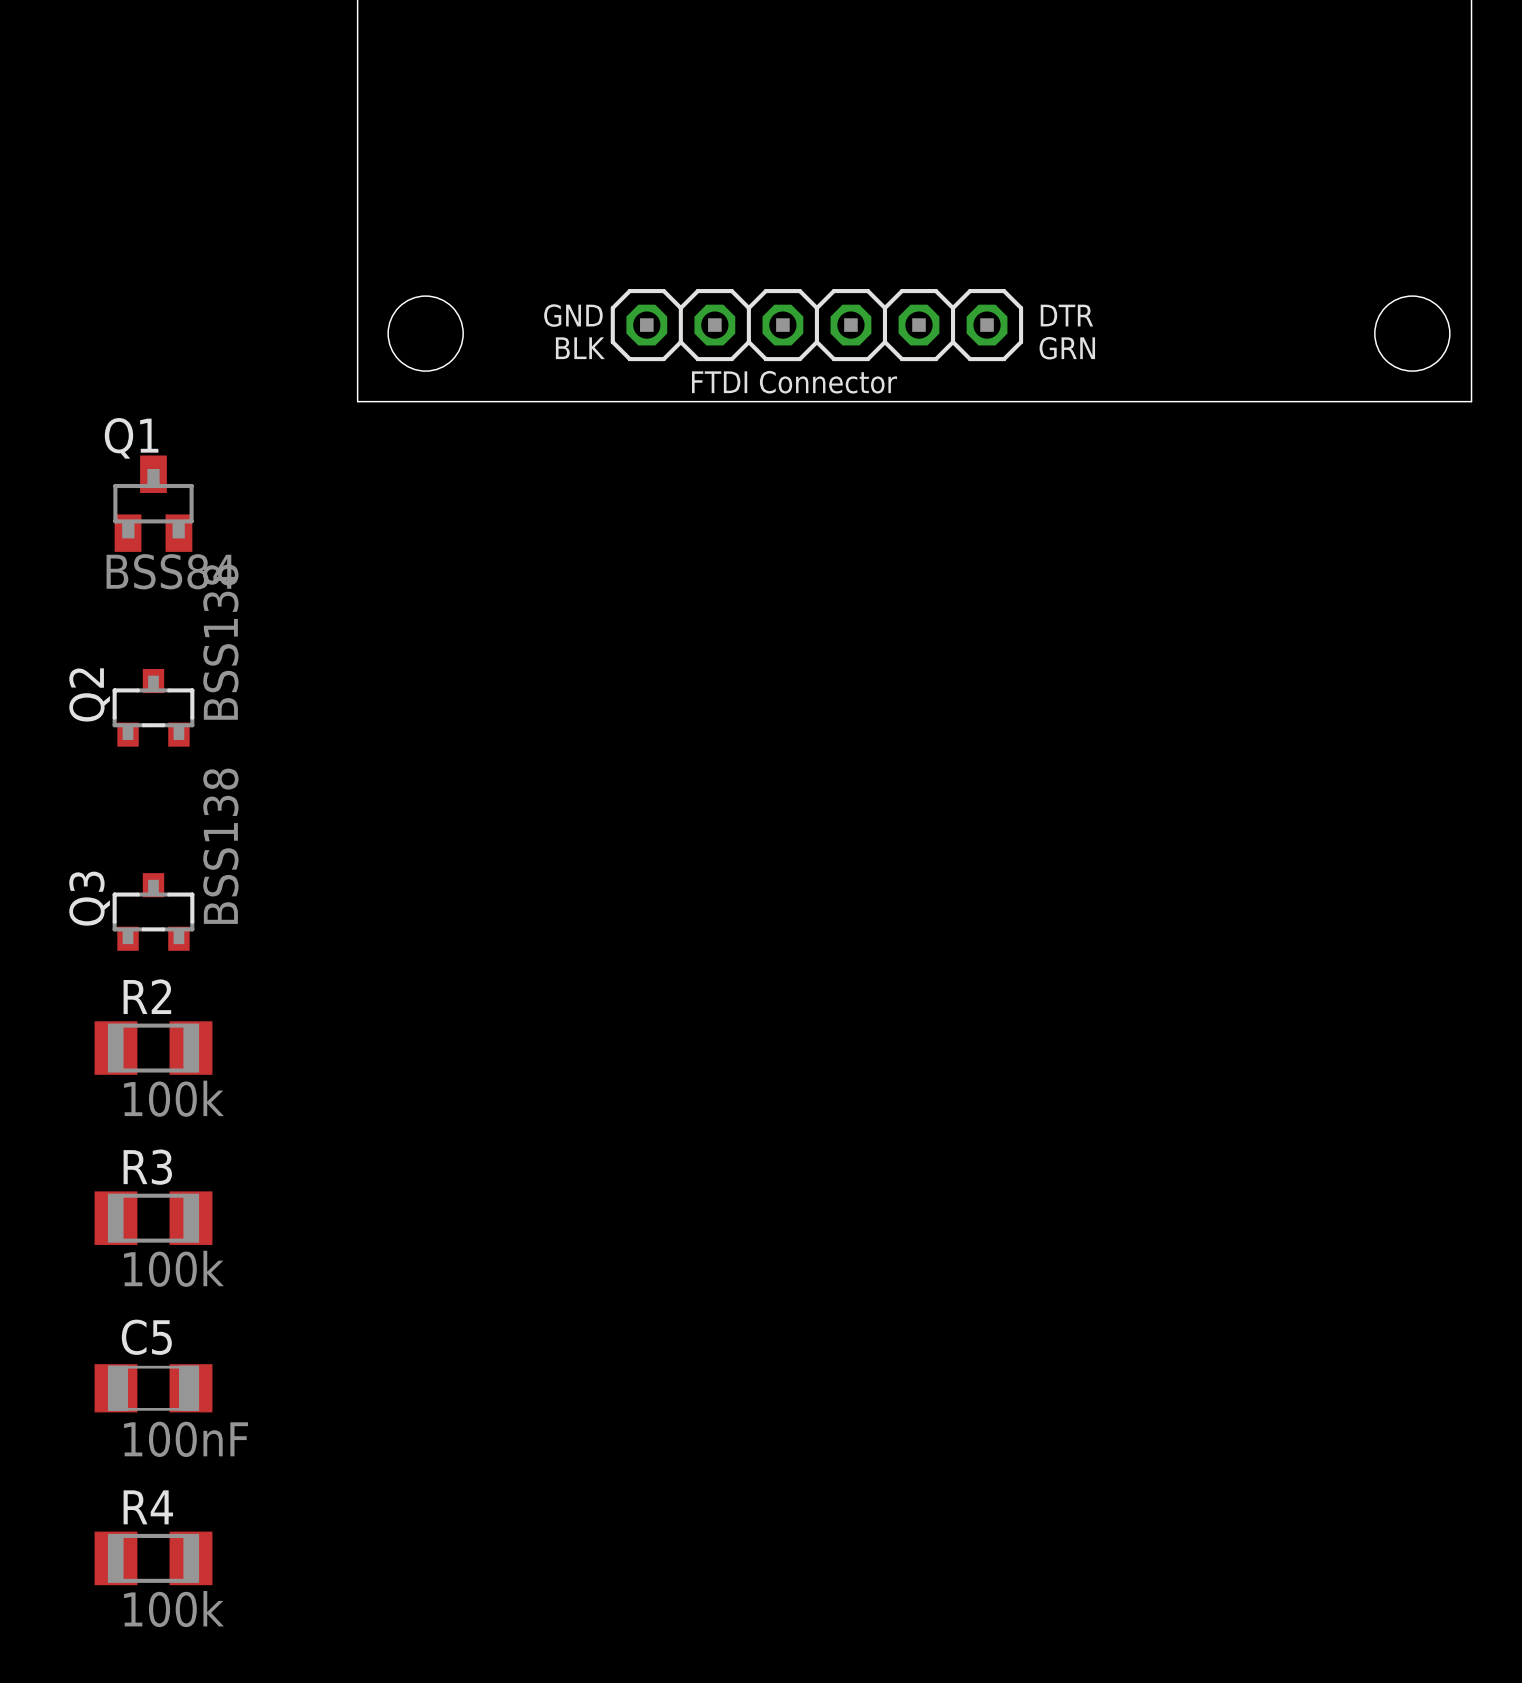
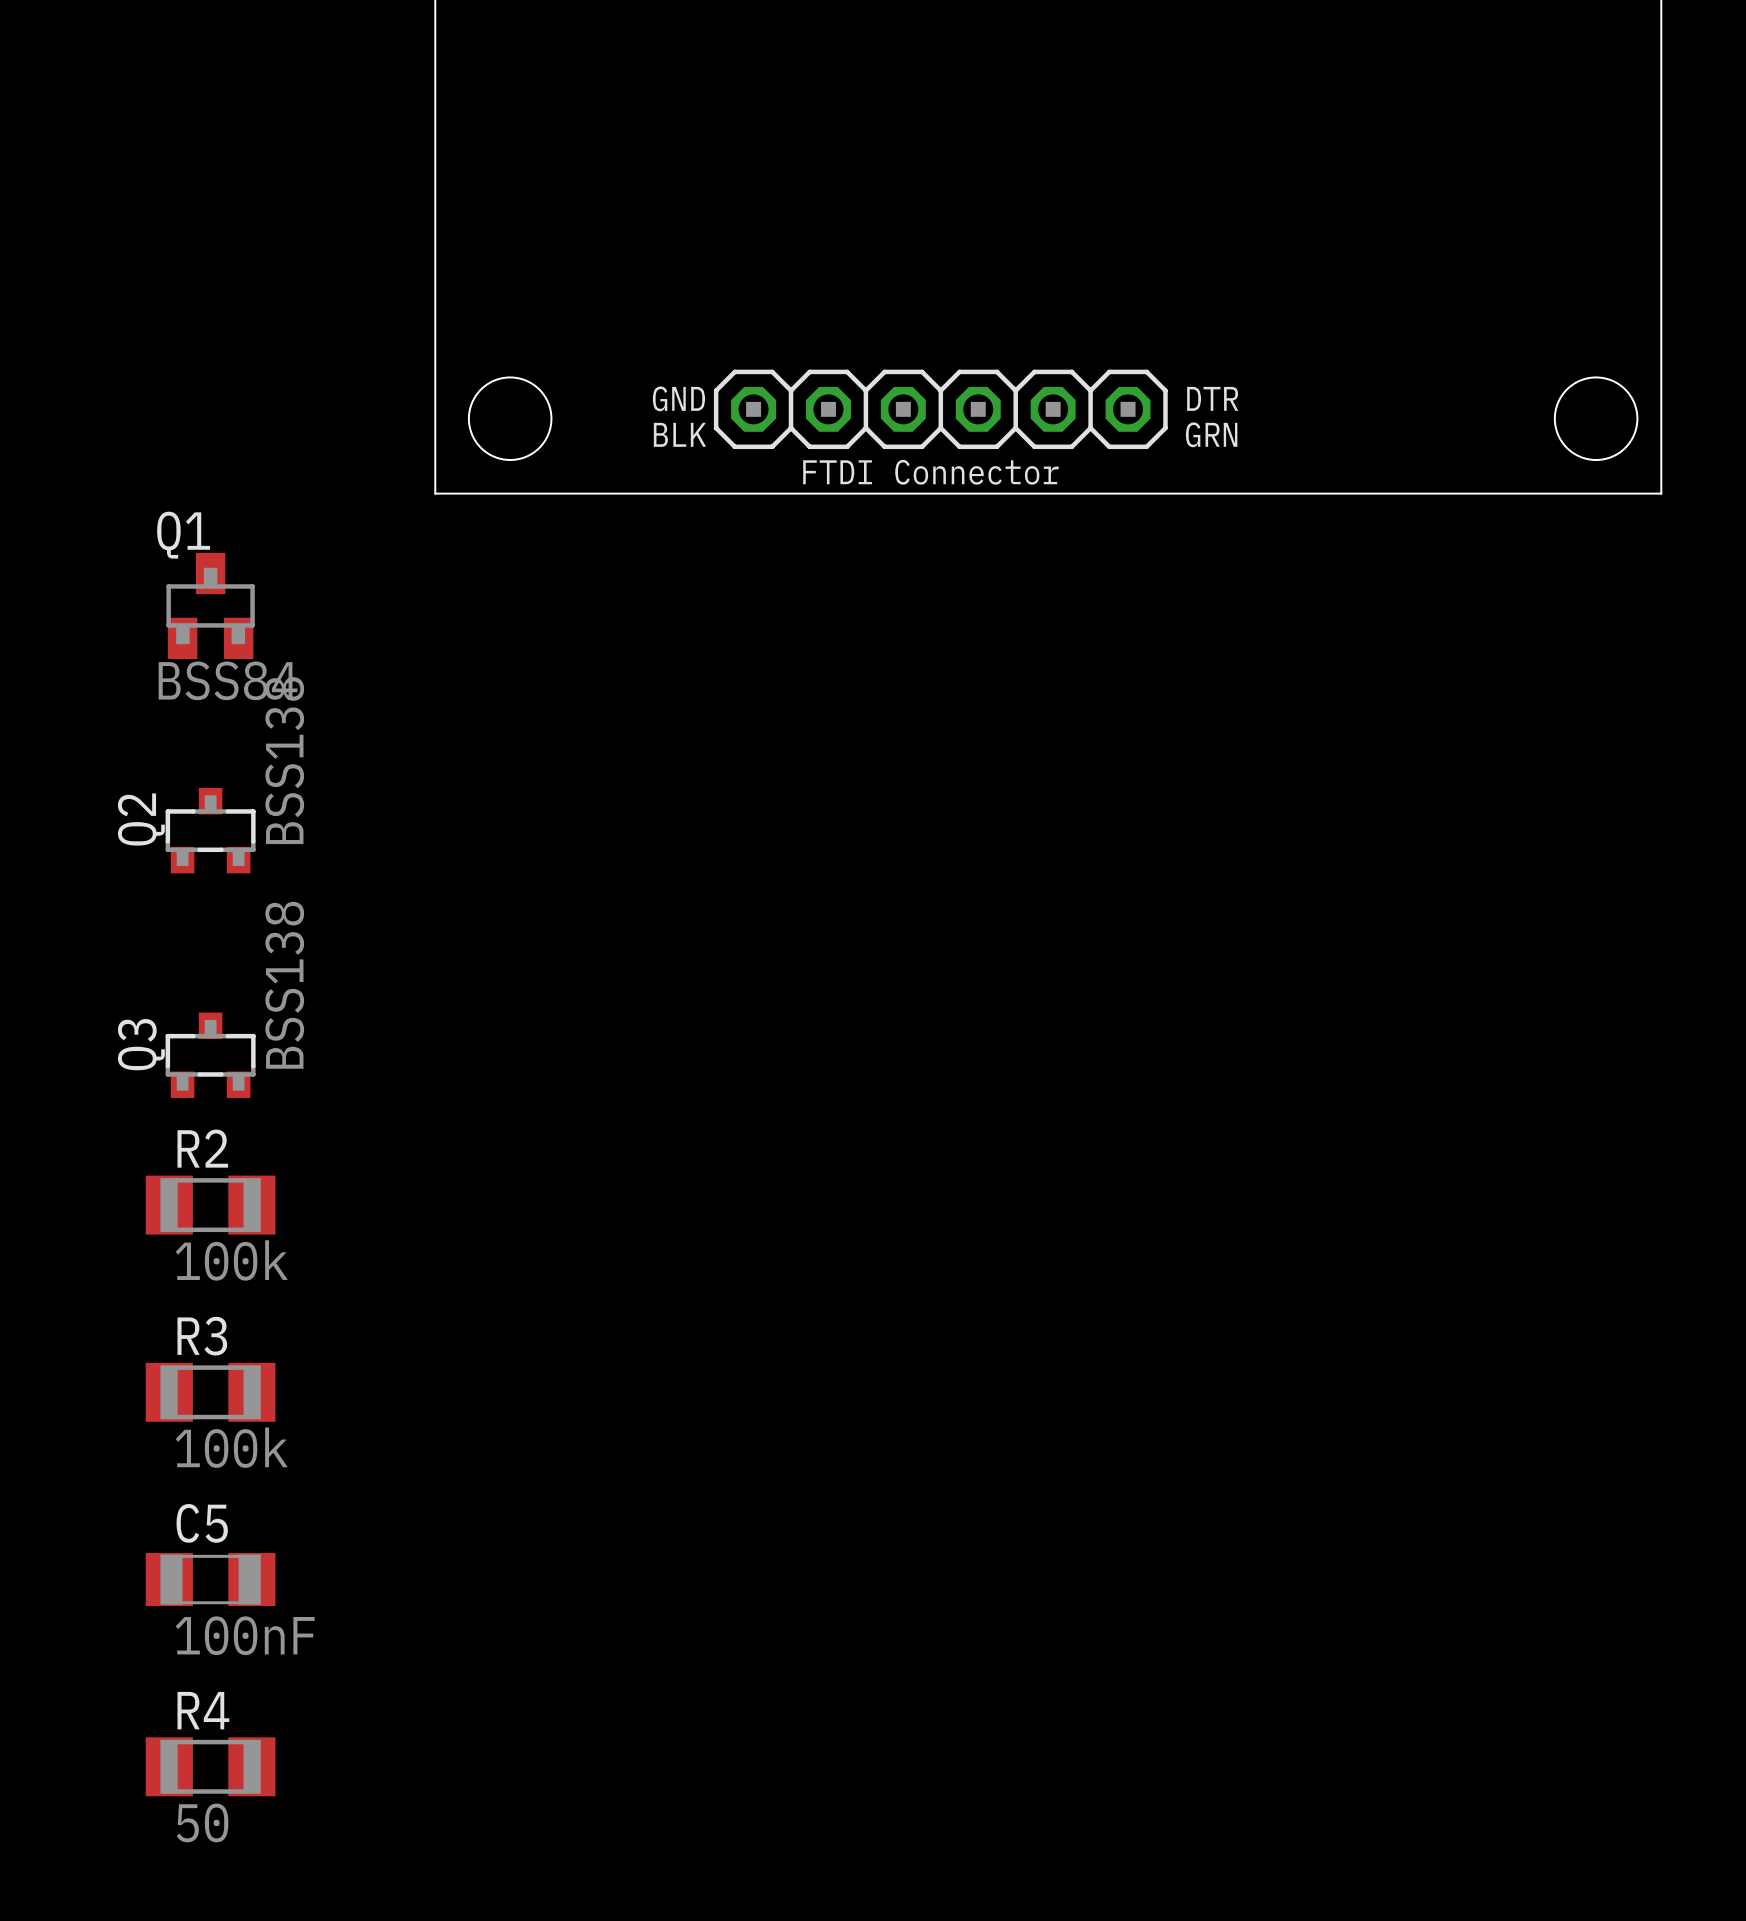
R4 value: 100k (173, 1609) -> 50 (202, 1822)

